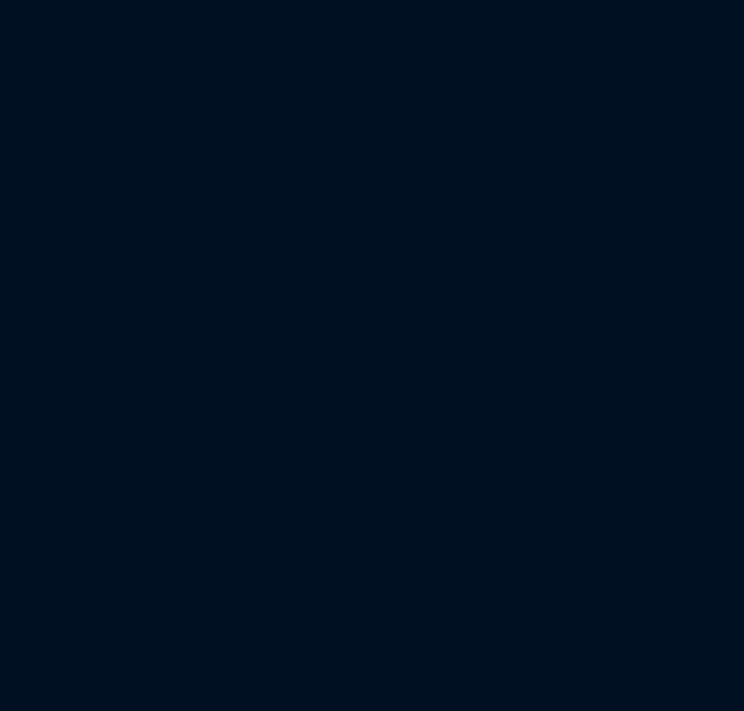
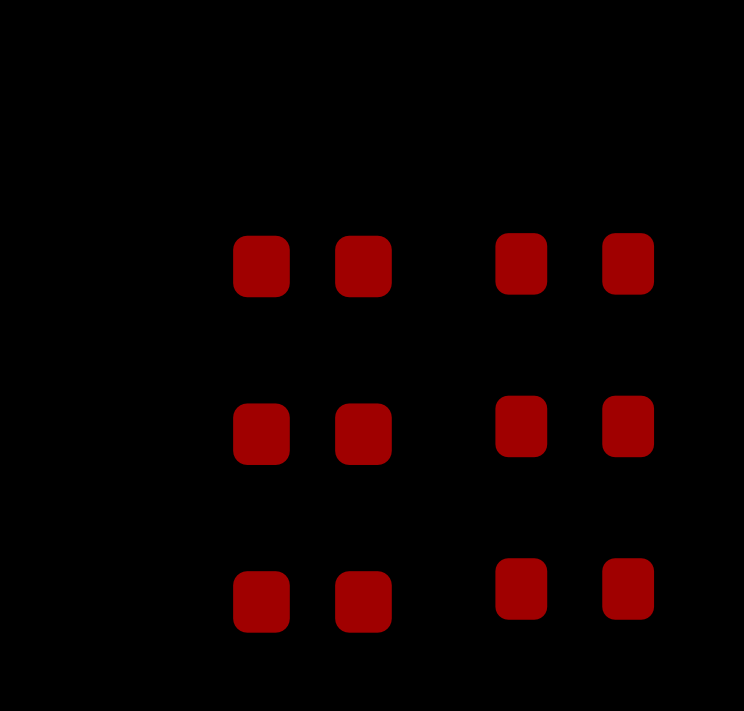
part: none -> (574, 263)
part: none -> (312, 266)
part: none -> (574, 426)
part: none -> (312, 434)
part: none -> (574, 588)
part: none -> (312, 601)

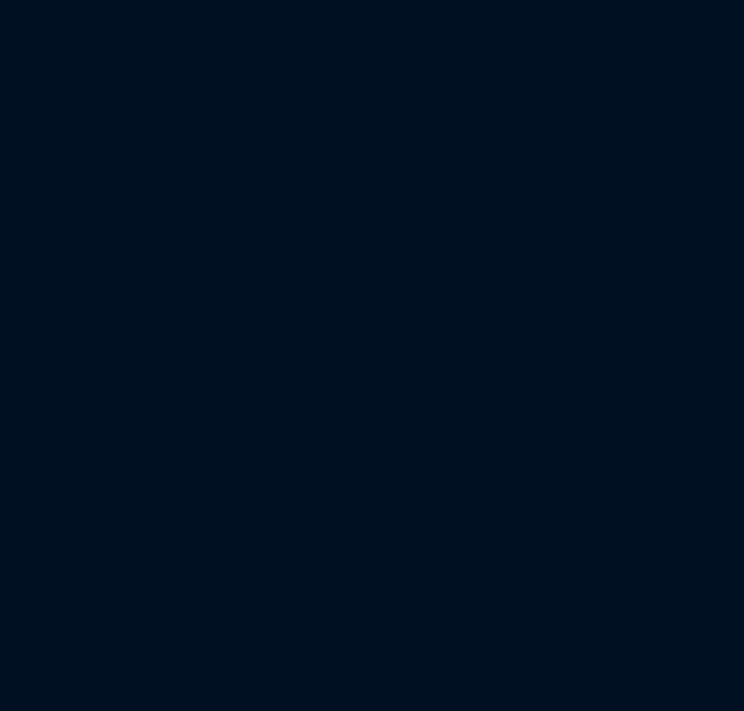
part: (574, 263) -> none
part: (312, 266) -> none
part: (574, 426) -> none
part: (312, 434) -> none
part: (574, 588) -> none
part: (312, 601) -> none

